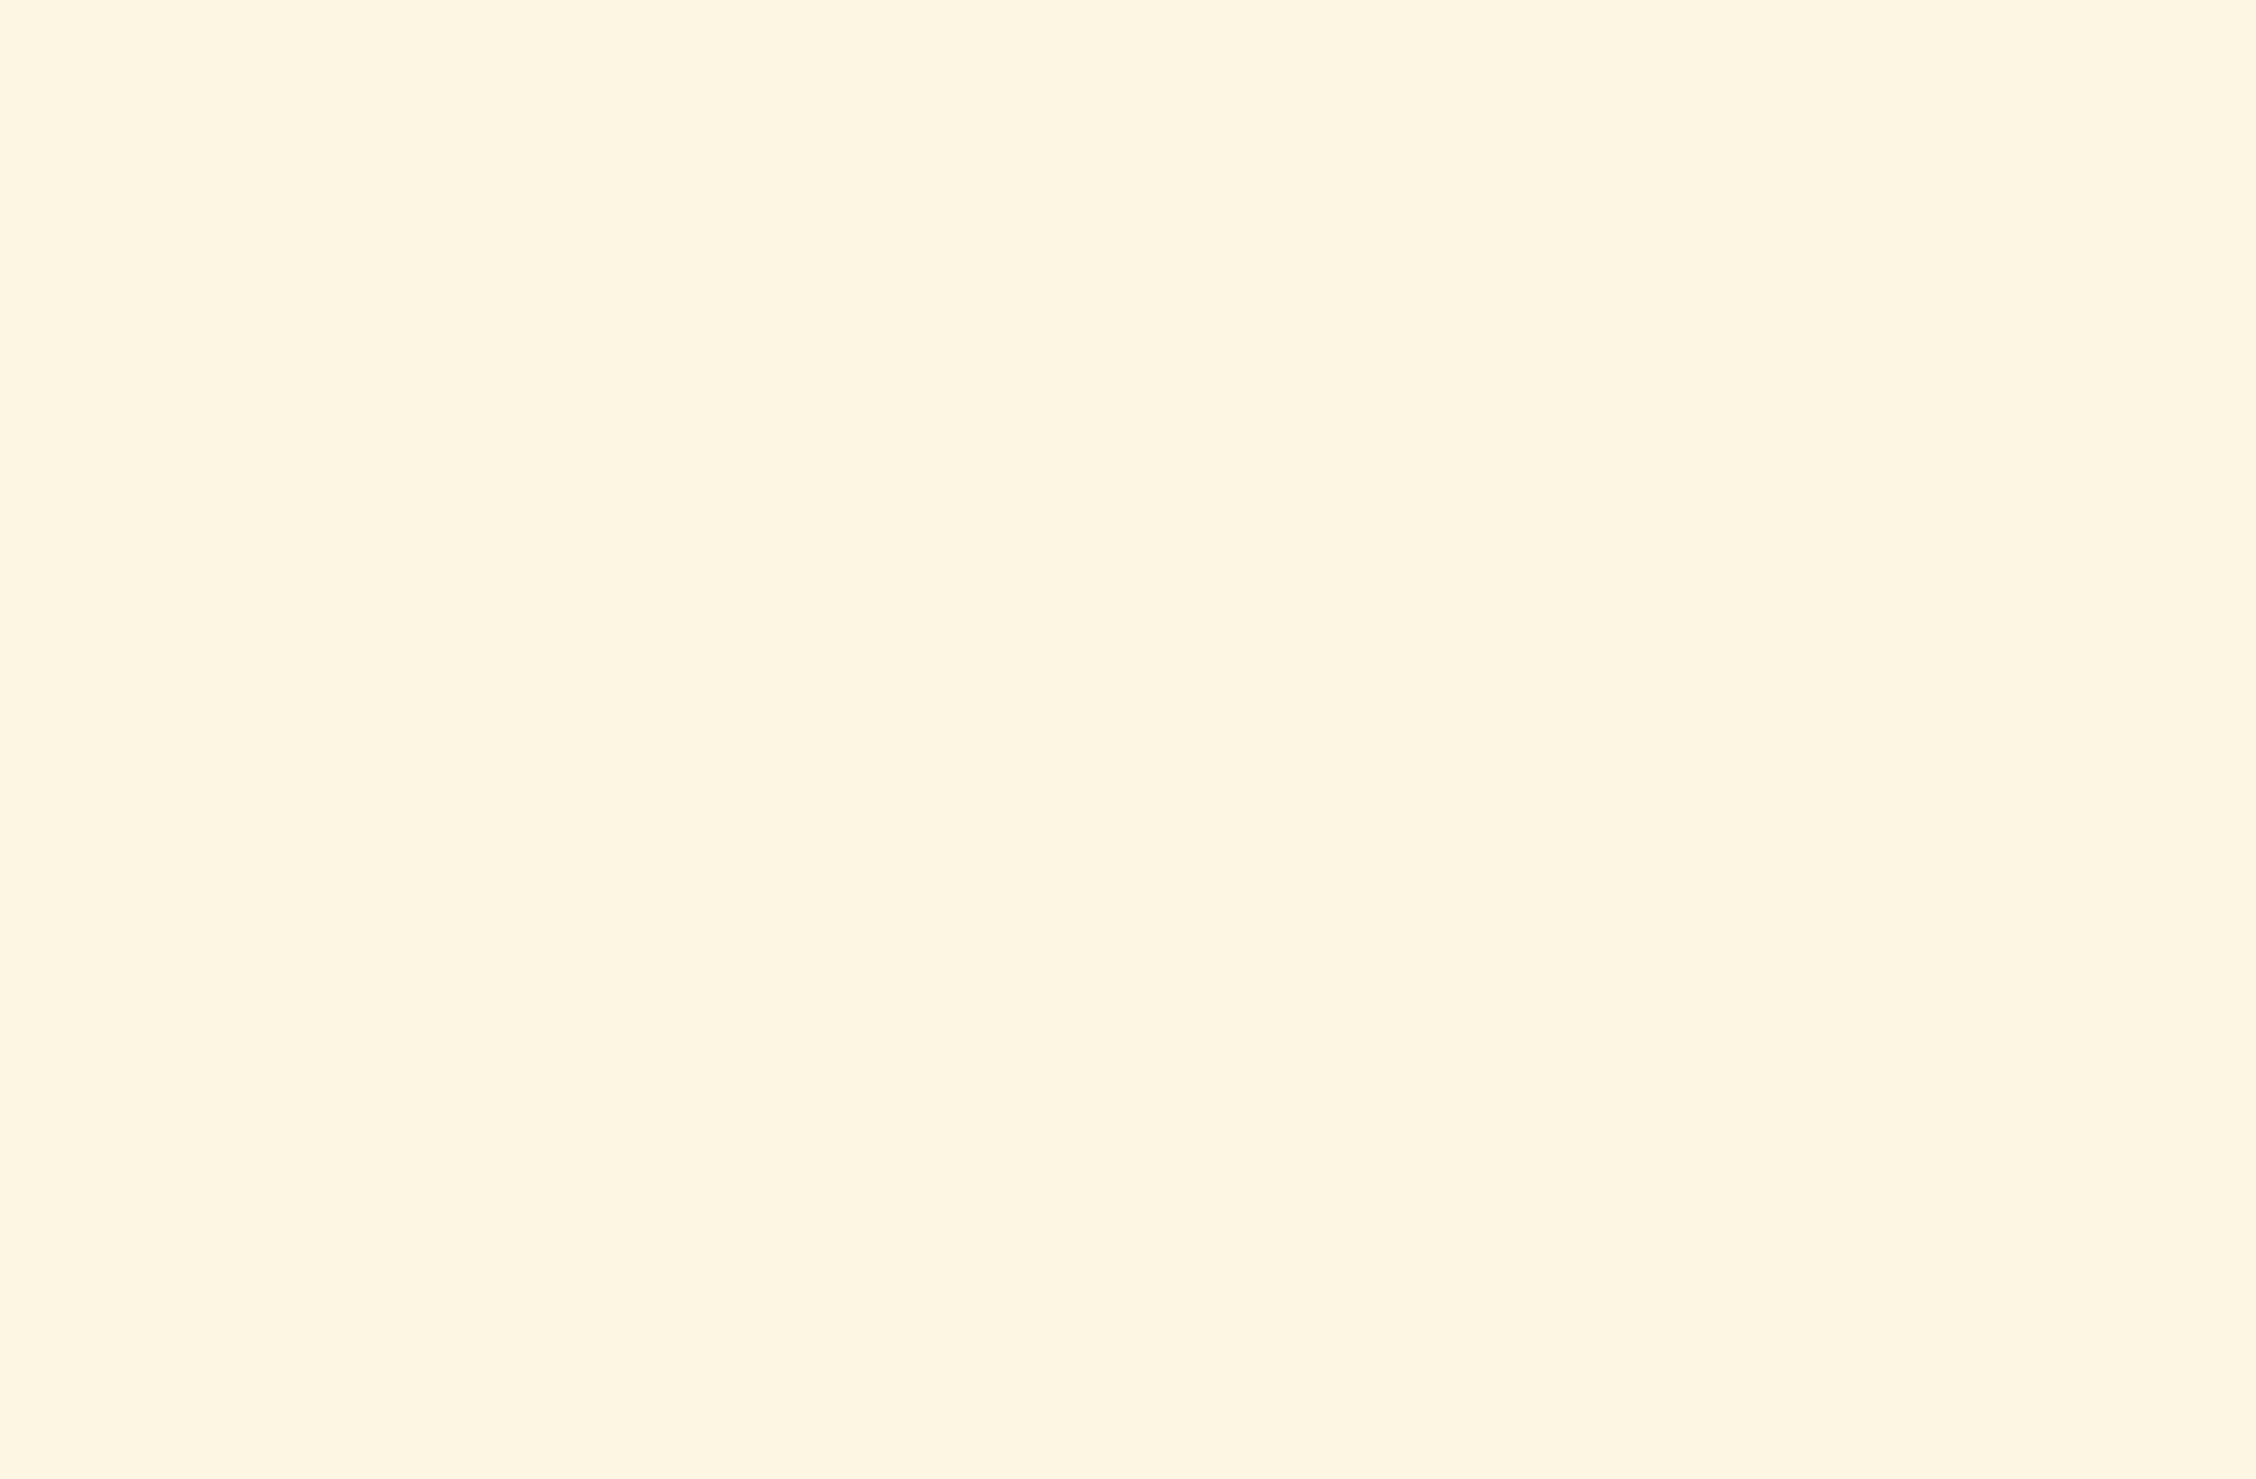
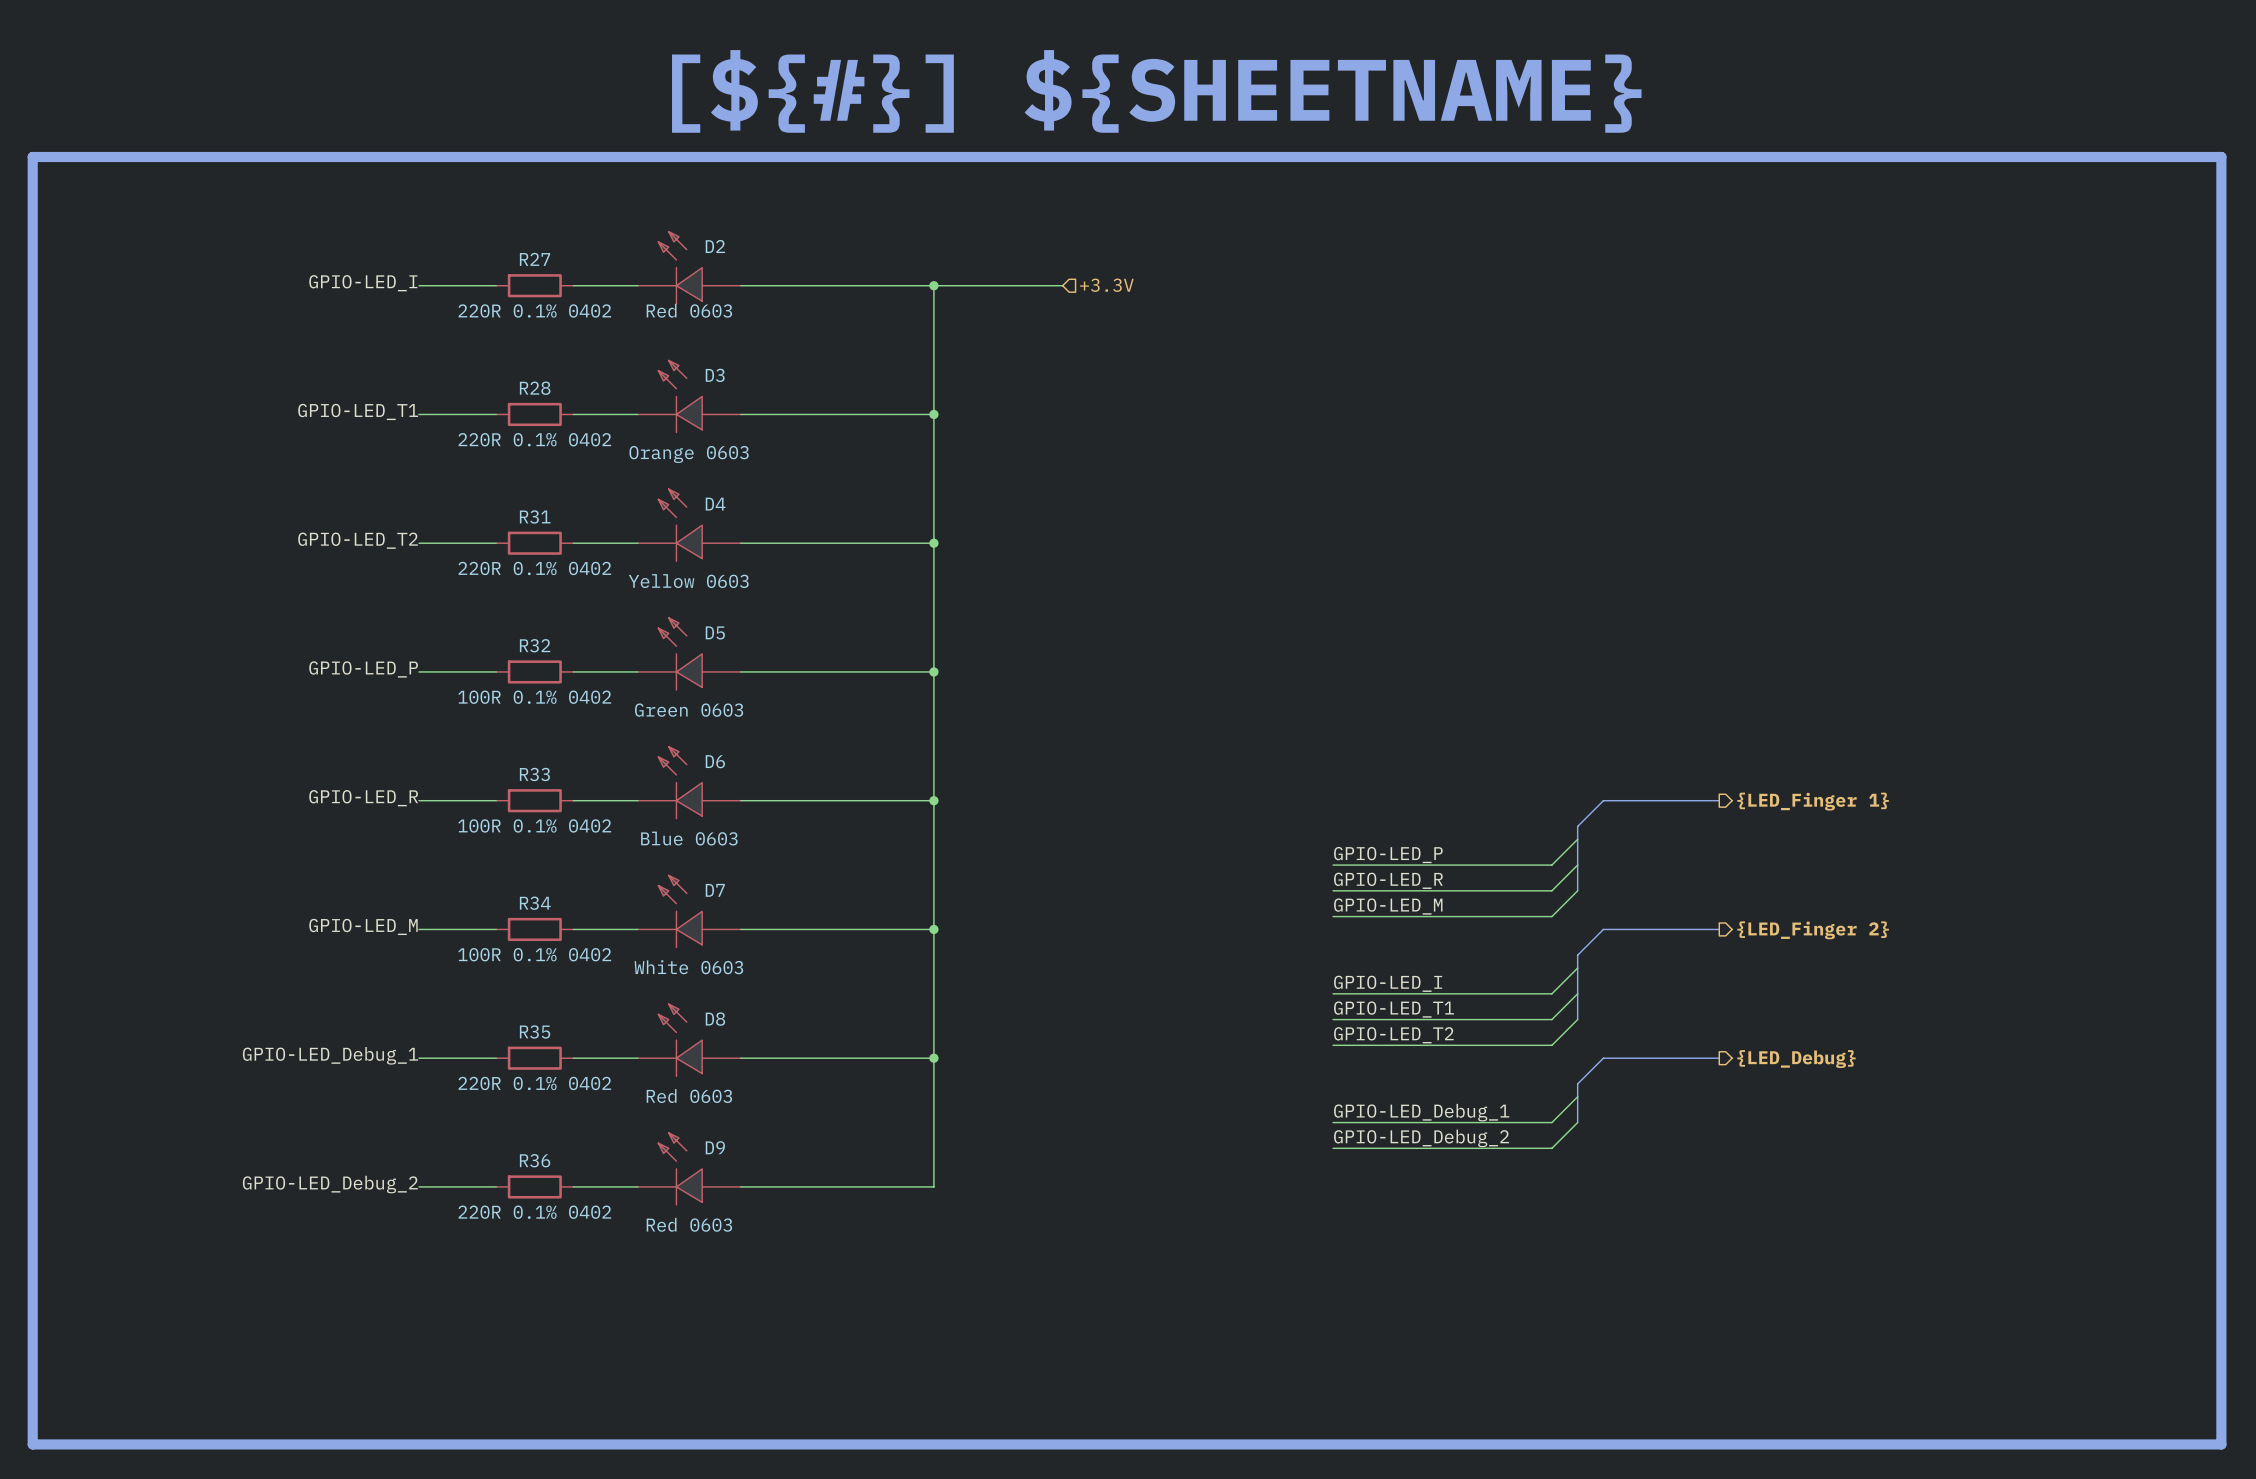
text: none -> [${#}] ${SHEETNAME} (1156, 91)
line: none -> (32, 156) (2221, 156) (2221, 1444) (32, 1444) (32, 156)
D2: none -> Red 0603 (689, 267)
label: none -> GPIO-LED_I (363, 283)
wire: none -> (418, 285) (496, 285)
R27: none -> 220R 0.1% 0402 (534, 285)
wire: none -> (573, 285) (637, 285)
wire: none -> (740, 285) (1062, 285)
wire: none -> (933, 285) (933, 1186) (740, 1186)
junction: none -> (933, 285)
hierarchical label: none -> +3.3V (1106, 285)
D3: none -> Orange 0603 (689, 396)
label: none -> GPIO-LED_T1 (358, 411)
wire: none -> (418, 414) (496, 414)
R28: none -> 220R 0.1% 0402 (534, 414)
wire: none -> (573, 414) (637, 414)
wire: none -> (740, 414) (933, 414)
junction: none -> (933, 414)
D4: none -> Yellow 0603 (689, 525)
label: none -> GPIO-LED_T2 (358, 540)
wire: none -> (418, 543) (496, 543)
R31: none -> 220R 0.1% 0402 (534, 543)
wire: none -> (573, 543) (637, 543)
wire: none -> (740, 543) (933, 543)
junction: none -> (933, 543)
D5: none -> Green 0603 (689, 653)
label: none -> GPIO-LED_P (363, 669)
wire: none -> (418, 671) (496, 671)
R32: none -> 100R 0.1% 0402 (534, 671)
wire: none -> (573, 671) (637, 671)
wire: none -> (740, 671) (933, 671)
junction: none -> (933, 671)
D6: none -> Blue 0603 (689, 782)
label: none -> GPIO-LED_R (363, 798)
wire: none -> (418, 800) (496, 800)
R33: none -> 100R 0.1% 0402 (534, 800)
wire: none -> (573, 800) (637, 800)
wire: none -> (740, 800) (933, 800)
junction: none -> (933, 800)
bus: none -> (1719, 800) (1603, 800) (1577, 826) (1577, 890)
hierarchical label: none -> {LED_Finger 1} (1813, 801)
wire: none -> (1577, 839) (1551, 865) (1333, 865)
label: none -> GPIO-LED_P (1388, 855)
wire: none -> (1577, 865) (1551, 890) (1333, 890)
label: none -> GPIO-LED_R (1388, 880)
wire: none -> (1577, 890) (1551, 916) (1333, 916)
label: none -> GPIO-LED_M (1388, 906)
D7: none -> White 0603 (689, 911)
label: none -> GPIO-LED_M (363, 926)
wire: none -> (418, 929) (496, 929)
R34: none -> 100R 0.1% 0402 (534, 929)
wire: none -> (573, 929) (637, 929)
wire: none -> (740, 929) (933, 929)
junction: none -> (933, 929)
bus: none -> (1719, 929) (1603, 929) (1577, 955) (1577, 1019)
hierarchical label: none -> {LED_Finger 2} (1813, 930)
wire: none -> (1577, 968) (1551, 993) (1333, 993)
label: none -> GPIO-LED_I (1388, 983)
wire: none -> (1577, 993) (1551, 1019) (1333, 1019)
label: none -> GPIO-LED_T1 (1393, 1009)
wire: none -> (1577, 1019) (1551, 1045) (1333, 1045)
label: none -> GPIO-LED_T2 (1393, 1035)
D8: none -> Red 0603 (689, 1040)
label: none -> GPIO-LED_Debug_1 (330, 1055)
wire: none -> (418, 1058) (496, 1058)
R35: none -> 220R 0.1% 0402 (534, 1058)
wire: none -> (573, 1058) (637, 1058)
wire: none -> (740, 1058) (933, 1058)
junction: none -> (933, 1058)
bus: none -> (1719, 1058) (1603, 1058) (1577, 1083) (1577, 1122)
hierarchical label: none -> {LED_Debug} (1796, 1059)
wire: none -> (1577, 1096) (1551, 1122) (1333, 1122)
label: none -> GPIO-LED_Debug_1 (1421, 1112)
wire: none -> (1577, 1122) (1551, 1148) (1333, 1148)
label: none -> GPIO-LED_Debug_2 (1421, 1138)
D9: none -> Red 0603 (689, 1168)
label: none -> GPIO-LED_Debug_2 (330, 1184)
wire: none -> (418, 1186) (496, 1186)
R36: none -> 220R 0.1% 0402 (534, 1186)
wire: none -> (573, 1186) (637, 1186)

